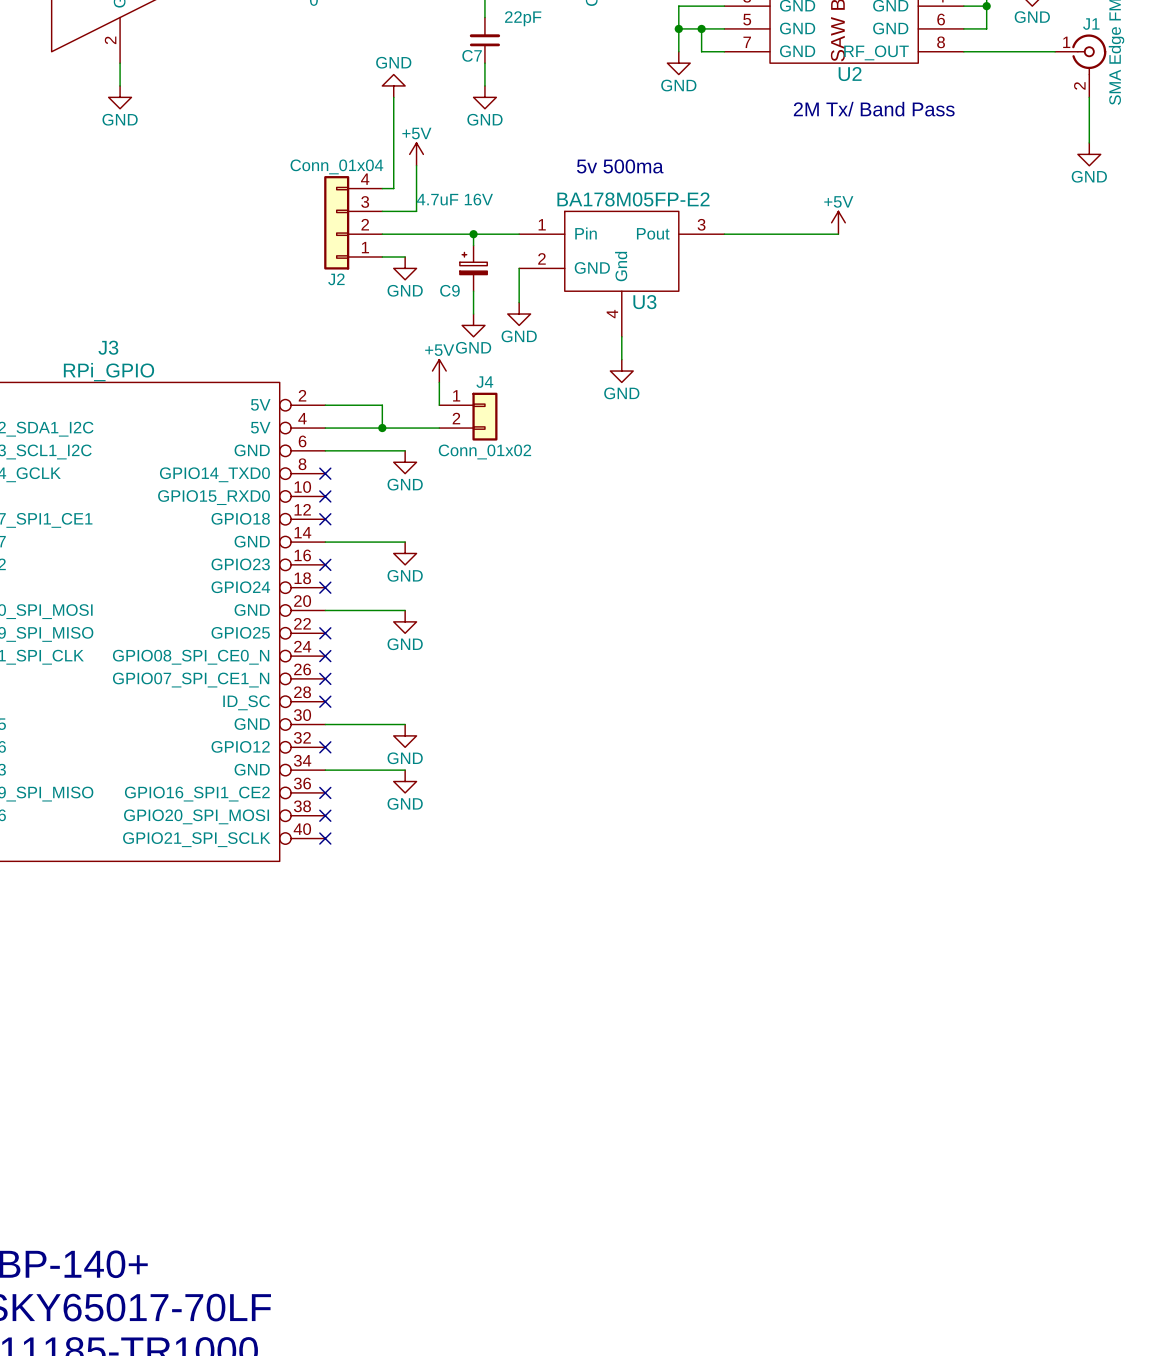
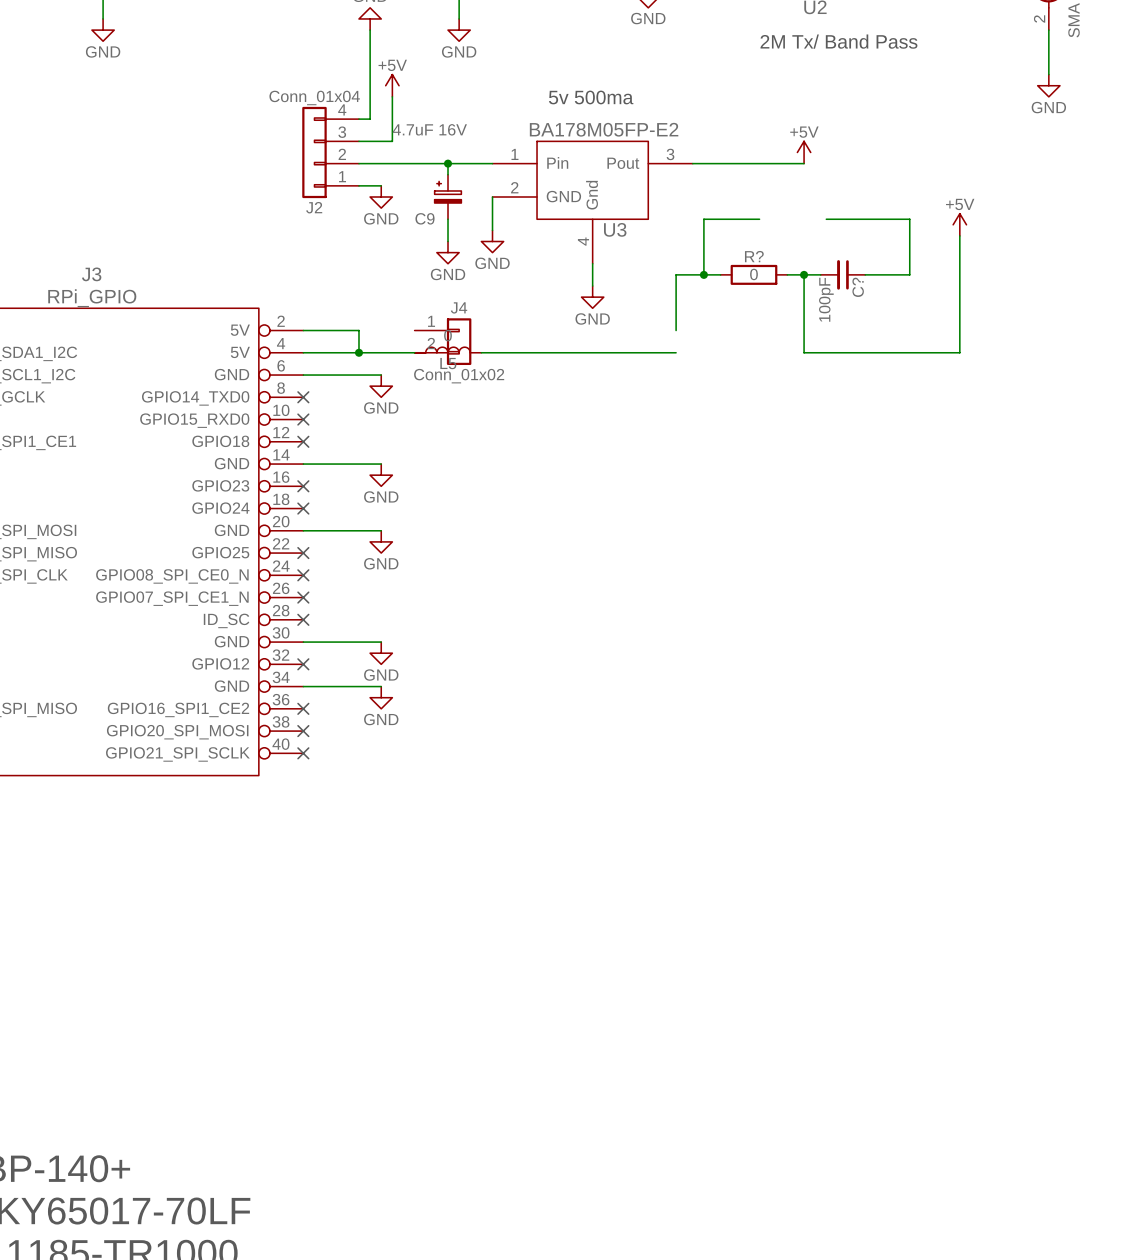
wire: none -> (759, 219) (703, 219) (703, 274)
wire: none -> (826, 219) (909, 219) (909, 274) (865, 274)
power symbol: none -> +5V (959, 224)
wire: none -> (959, 235) (959, 352) (804, 352) (804, 274)
junction: none -> (703, 274)
wire: none -> (720, 274) (676, 274) (676, 330)
R?: none -> 0 (753, 274)
wire: none -> (787, 274) (820, 274)
junction: none -> (804, 274)
C?: none -> 100pF (843, 274)
power symbol: +5V (439, 371) -> none
wire: (439, 382) (439, 405) -> none
L5: none -> 0 (448, 349)
wire: none -> (481, 352) (676, 352)

